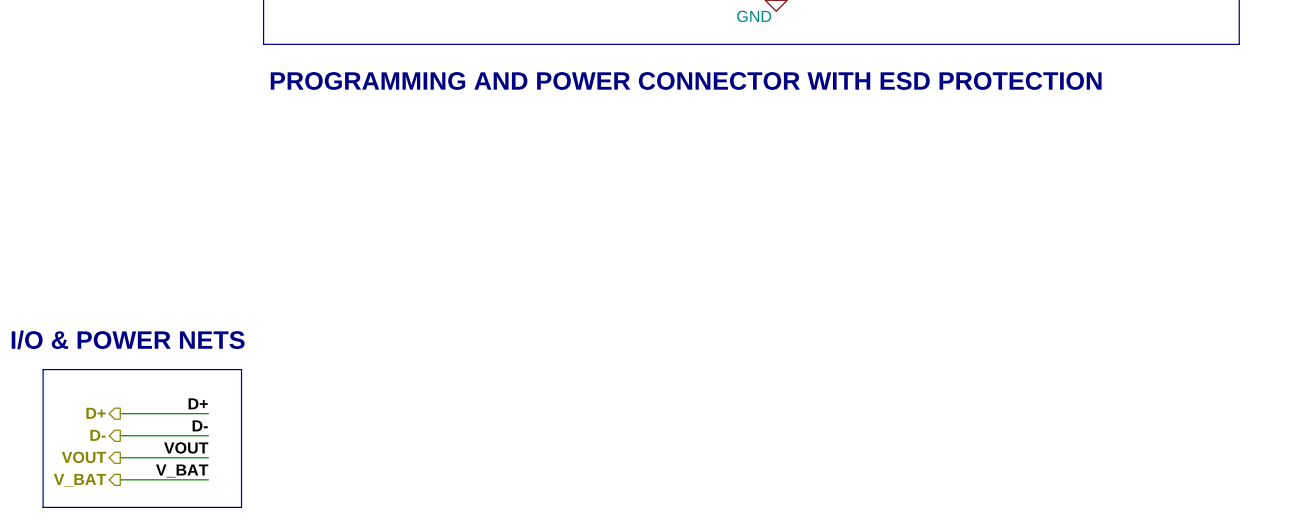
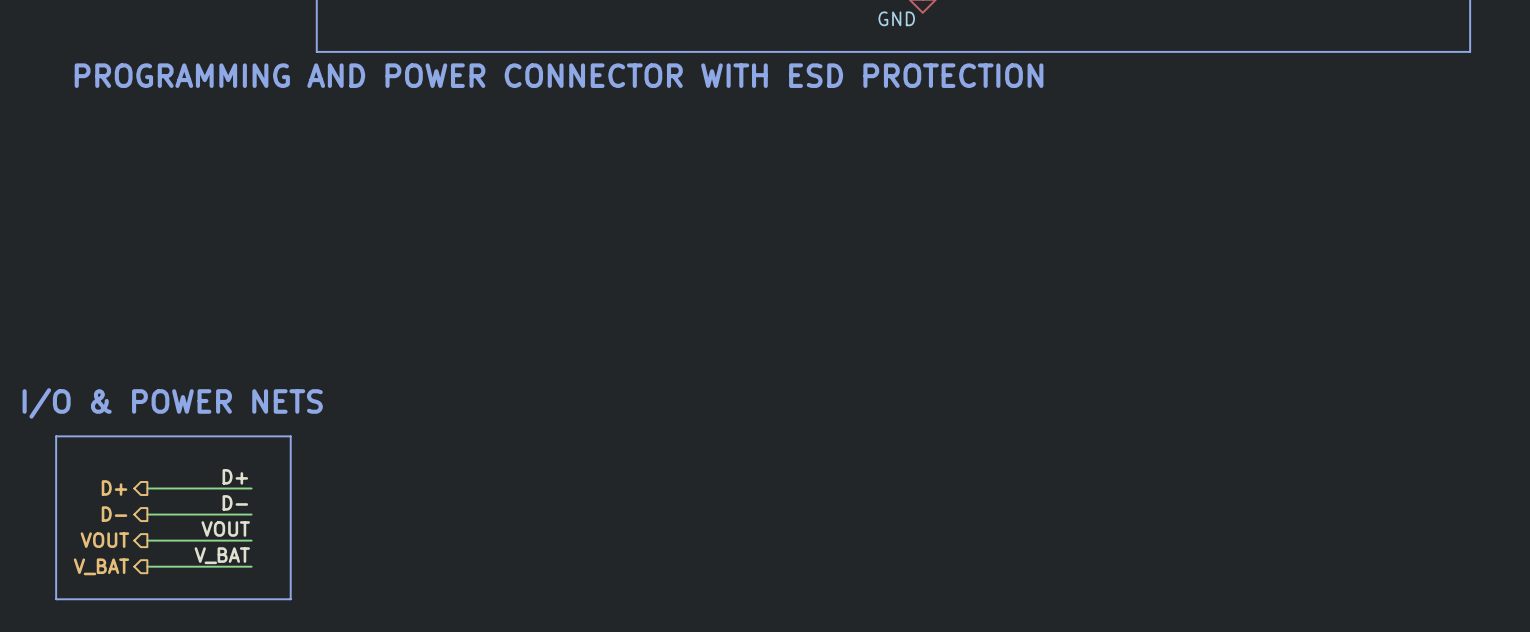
text position: PROGRAMMING AND POWER CONNECTOR WITH ESD PROTECTION (686, 80) -> PROGRAMMING AND POWER CONNECTOR WITH ESD PROTECTION (559, 75)

